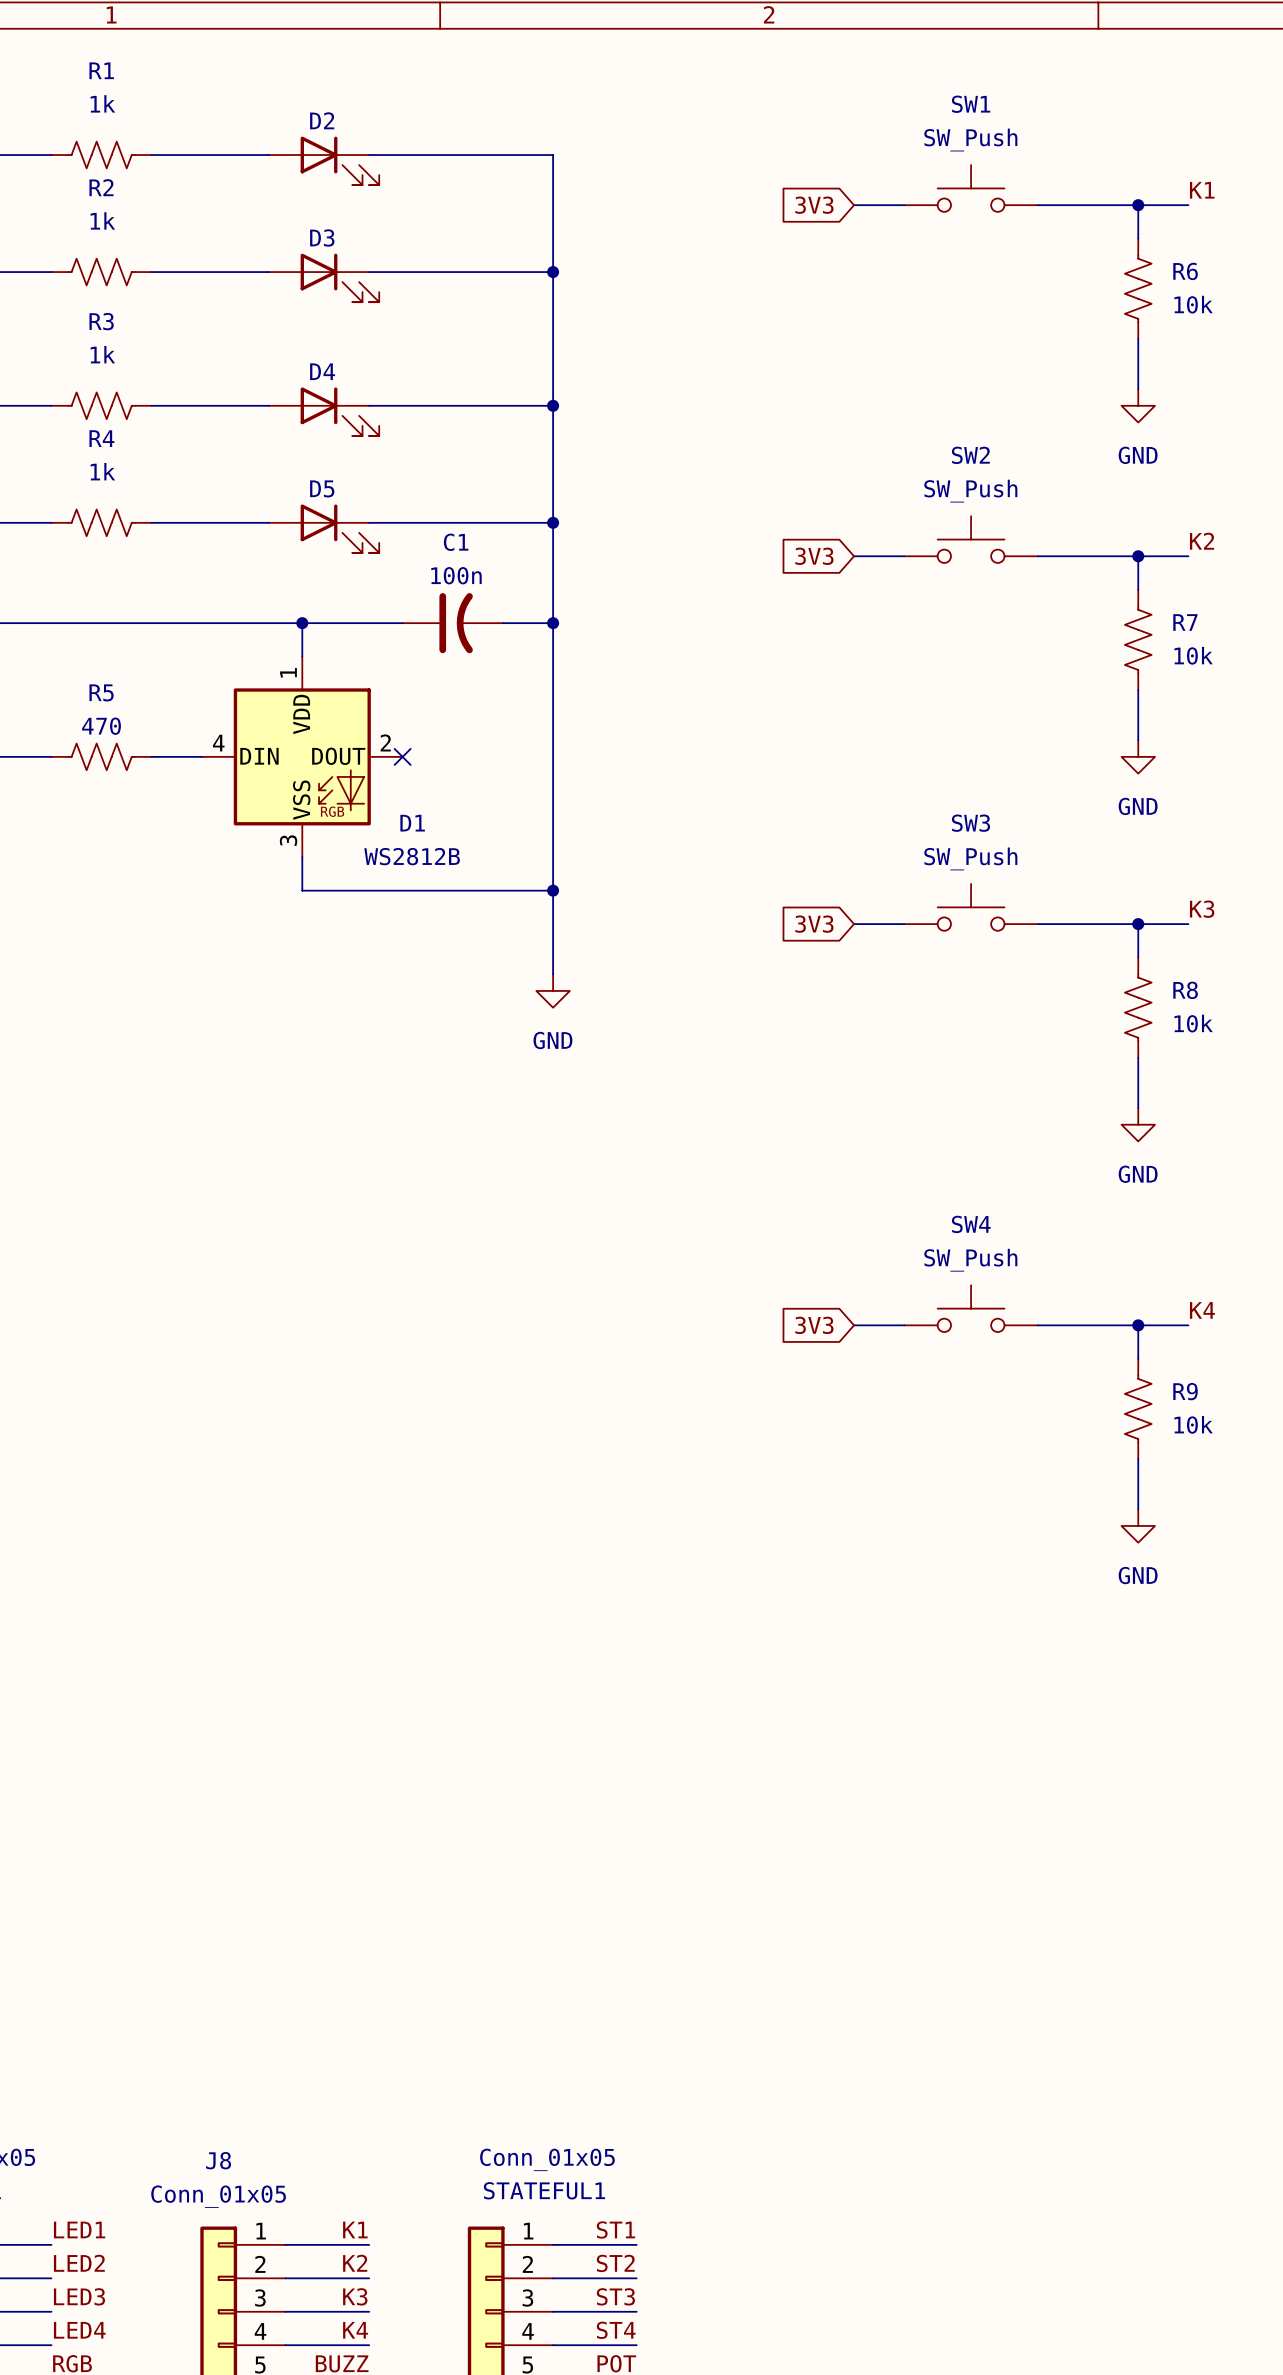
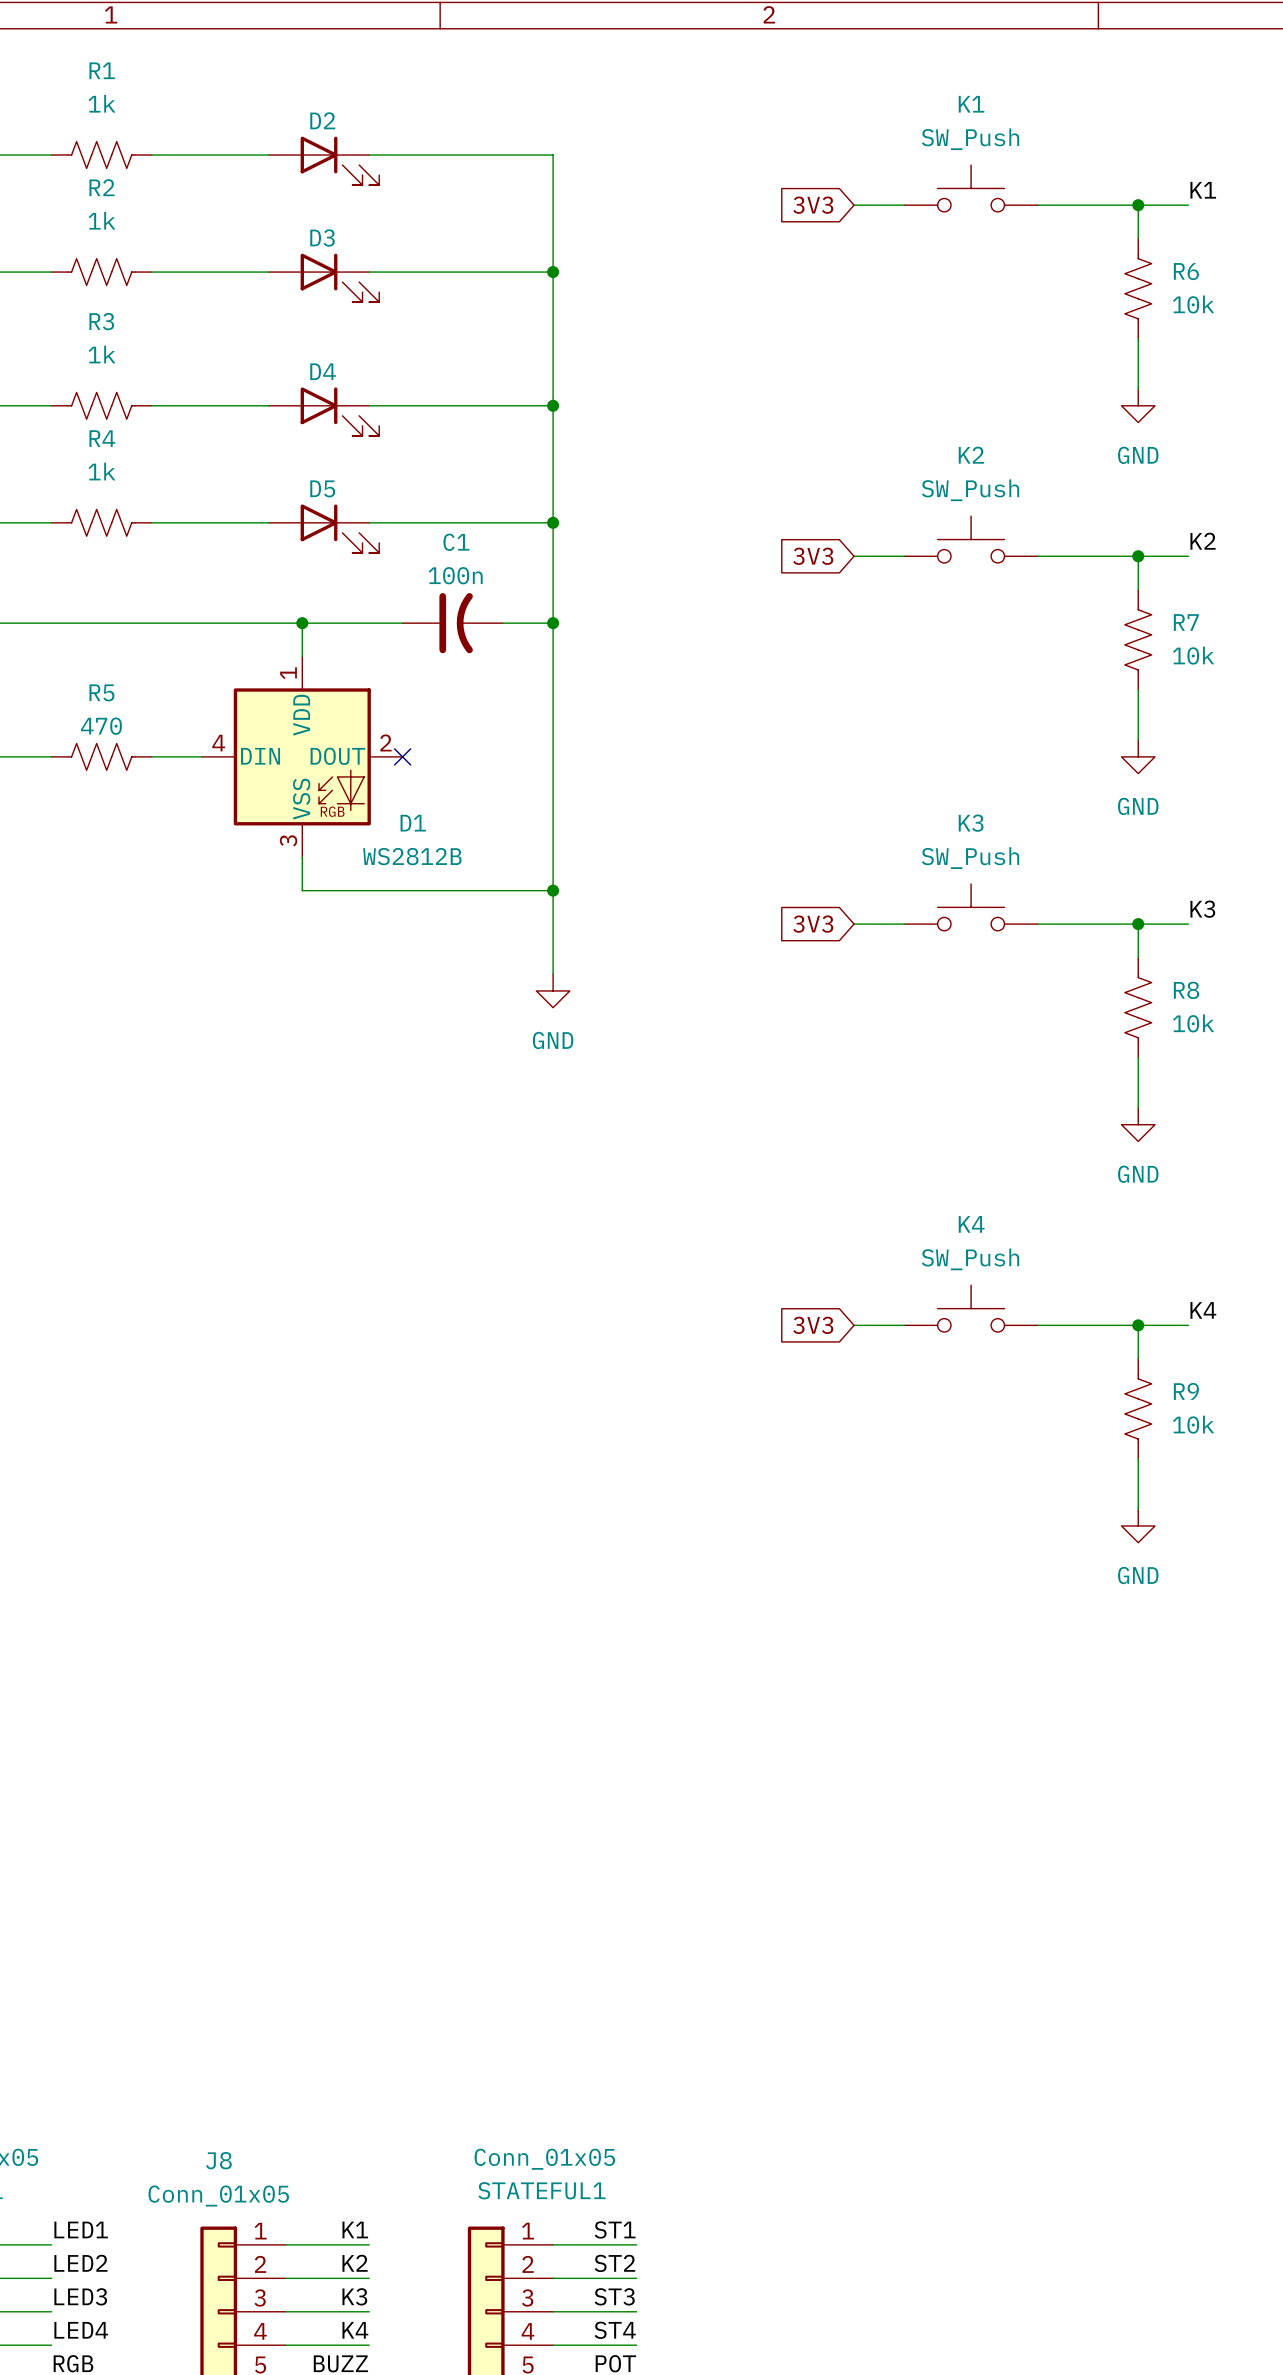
SW1 name: SW1 (971, 104) -> K1 (971, 104)
SW2 name: SW2 (970, 455) -> K2 (971, 455)
SW3 name: SW3 (970, 823) -> K3 (971, 823)
SW4 name: SW4 (971, 1224) -> K4 (971, 1224)

